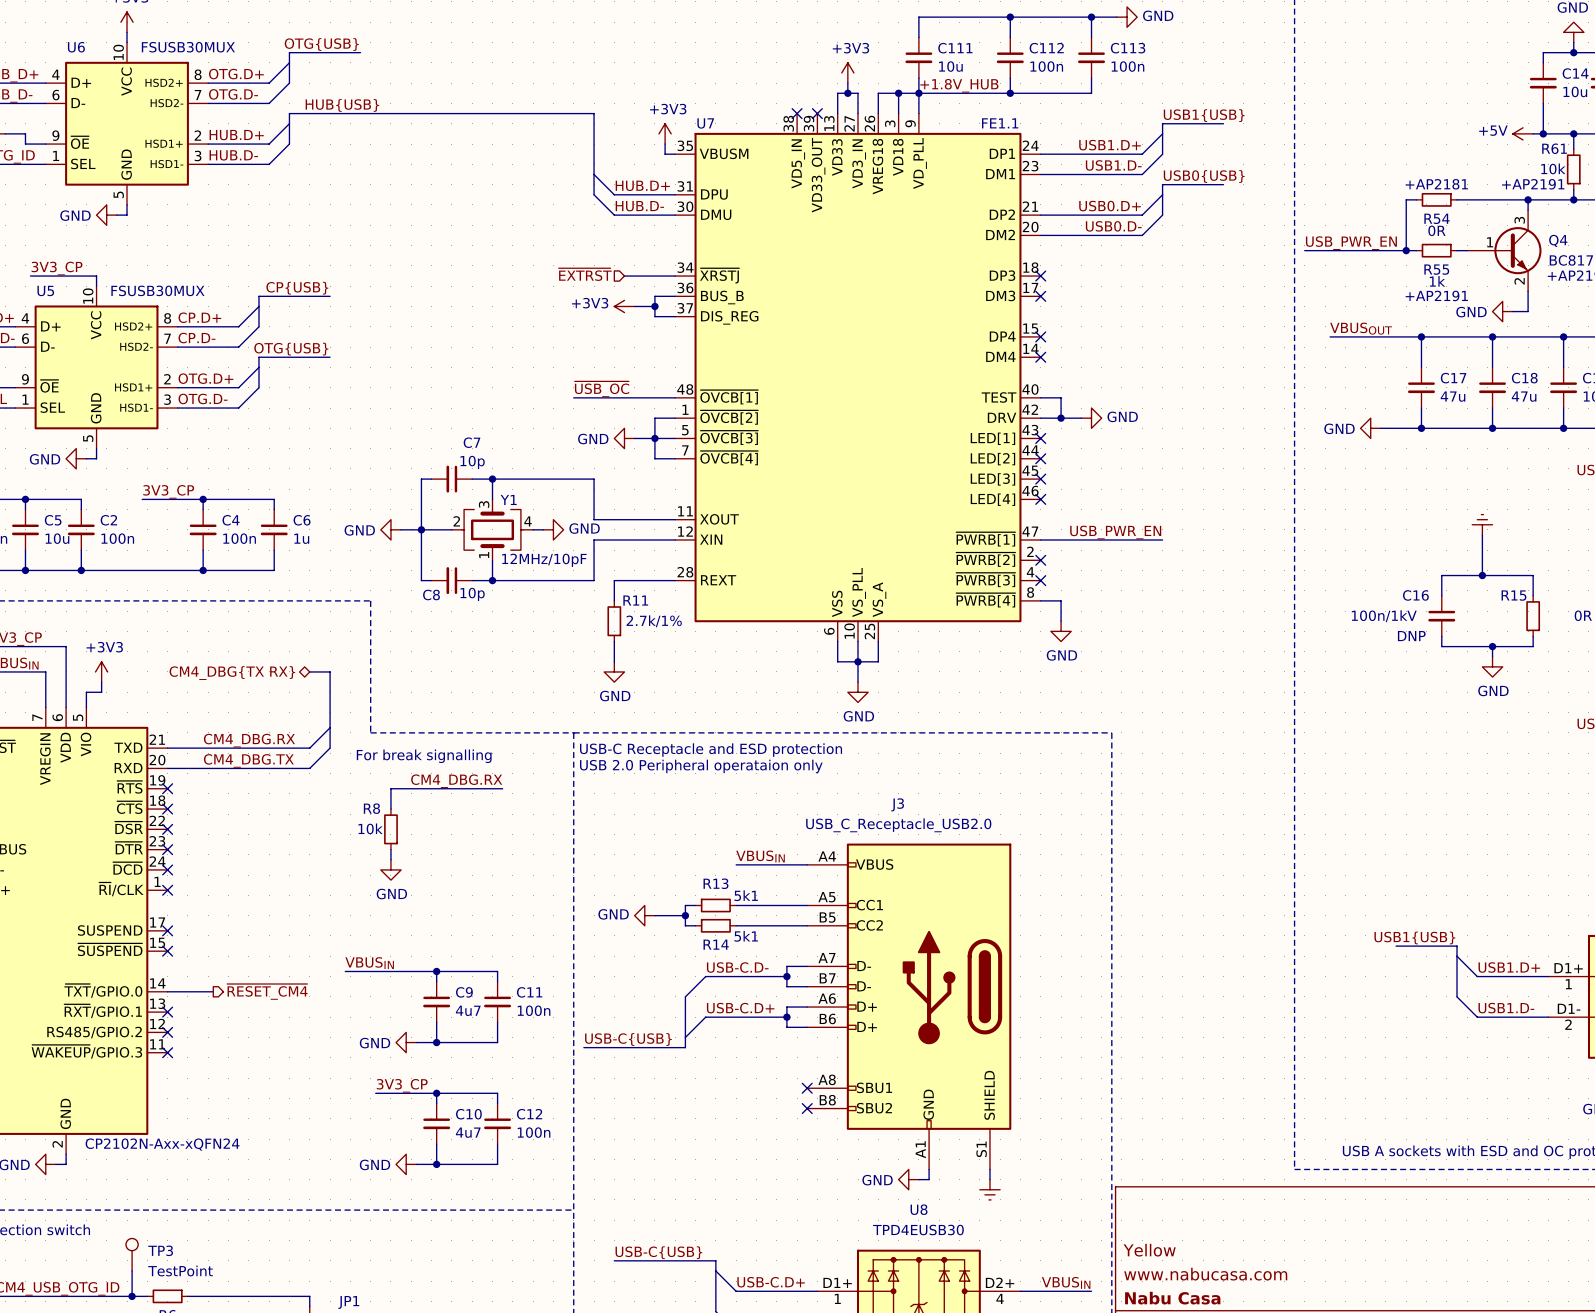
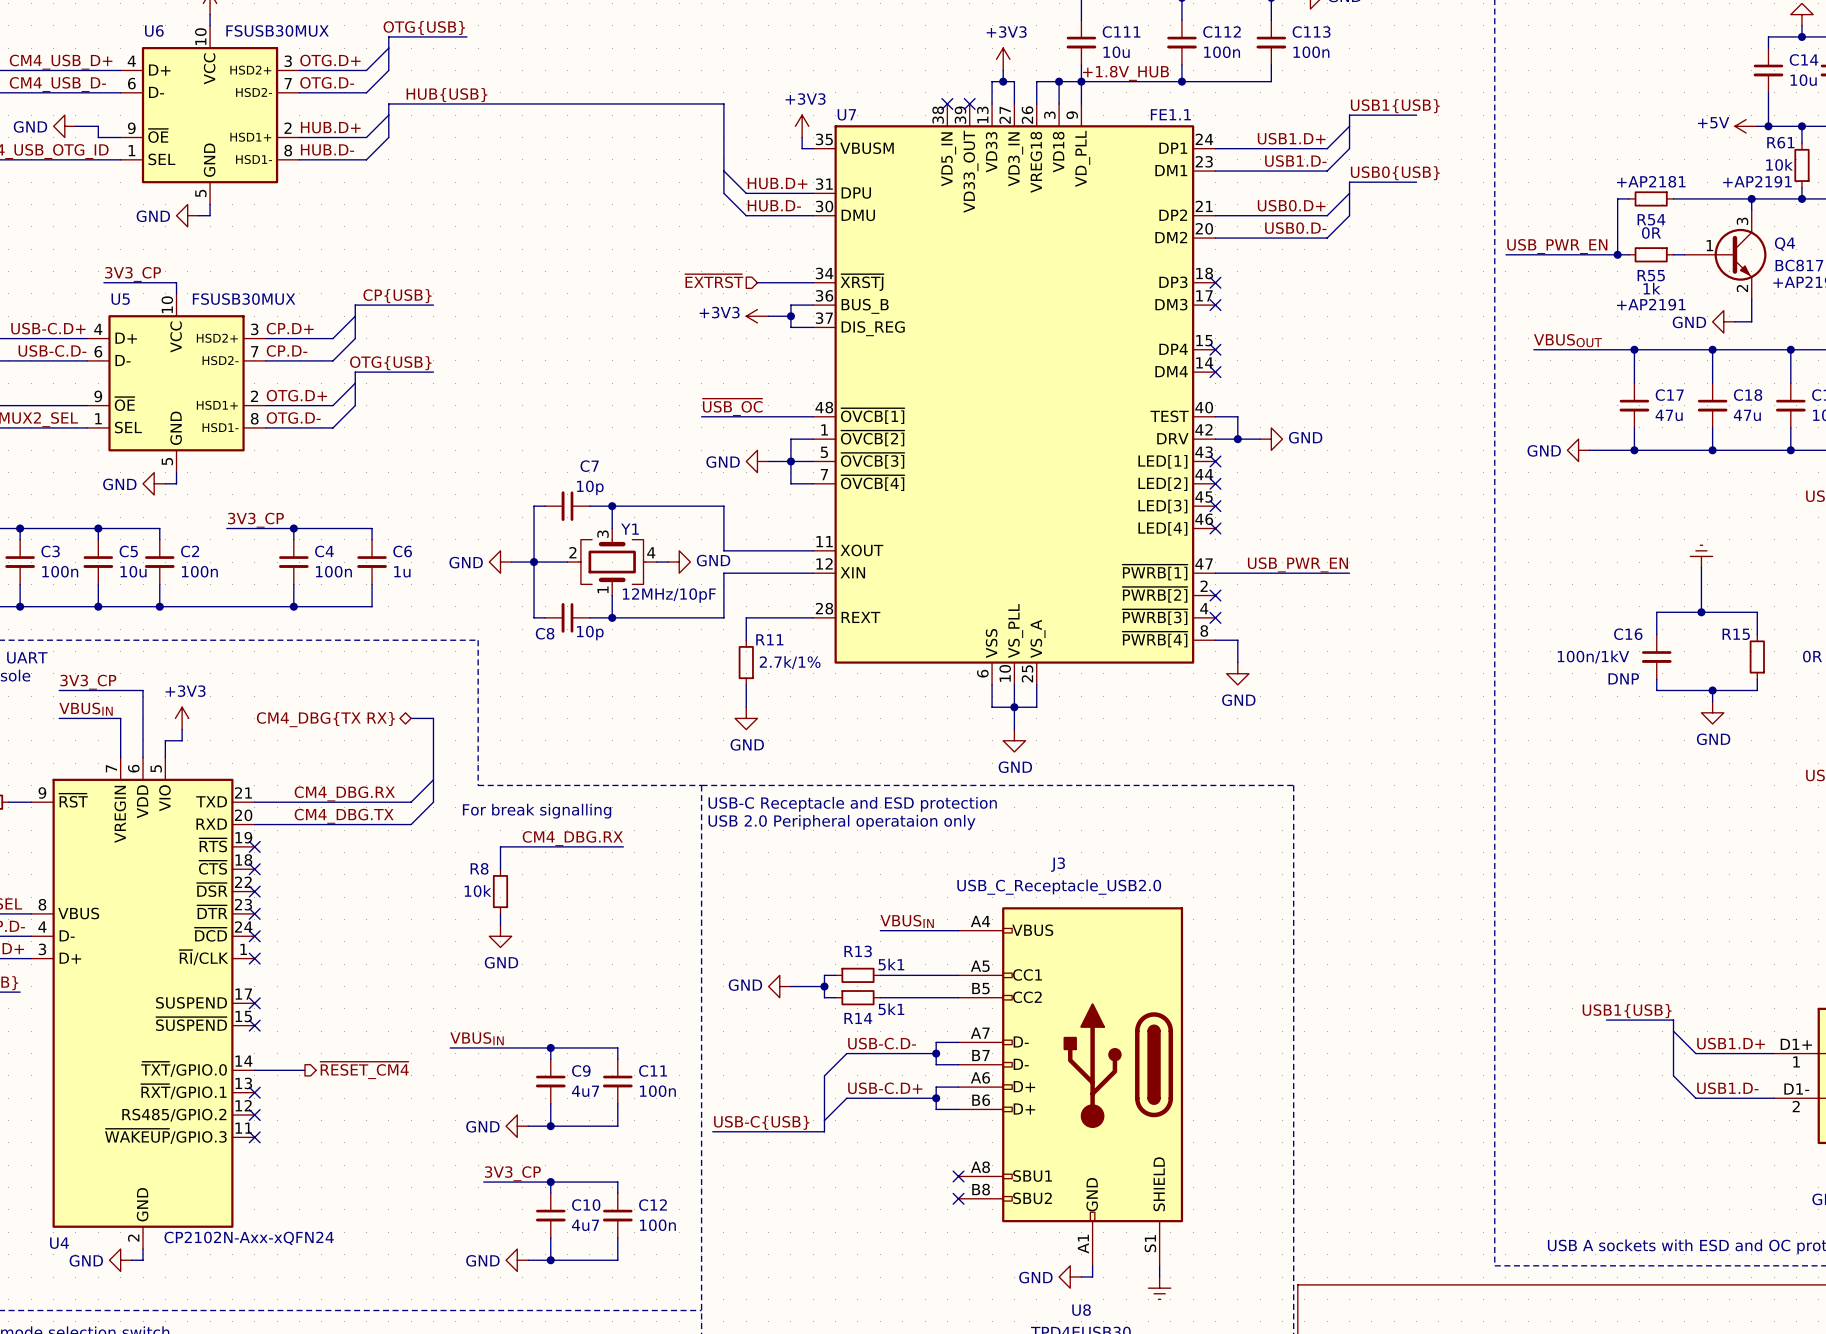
U6 pin number: 8 (198, 74) -> 3 (288, 61)
U6 pin number: 3 (198, 155) -> 8 (288, 150)
U5 pin number: 8 (167, 318) -> 3 (254, 329)
U5 pin number: 3 (167, 399) -> 8 (254, 418)

